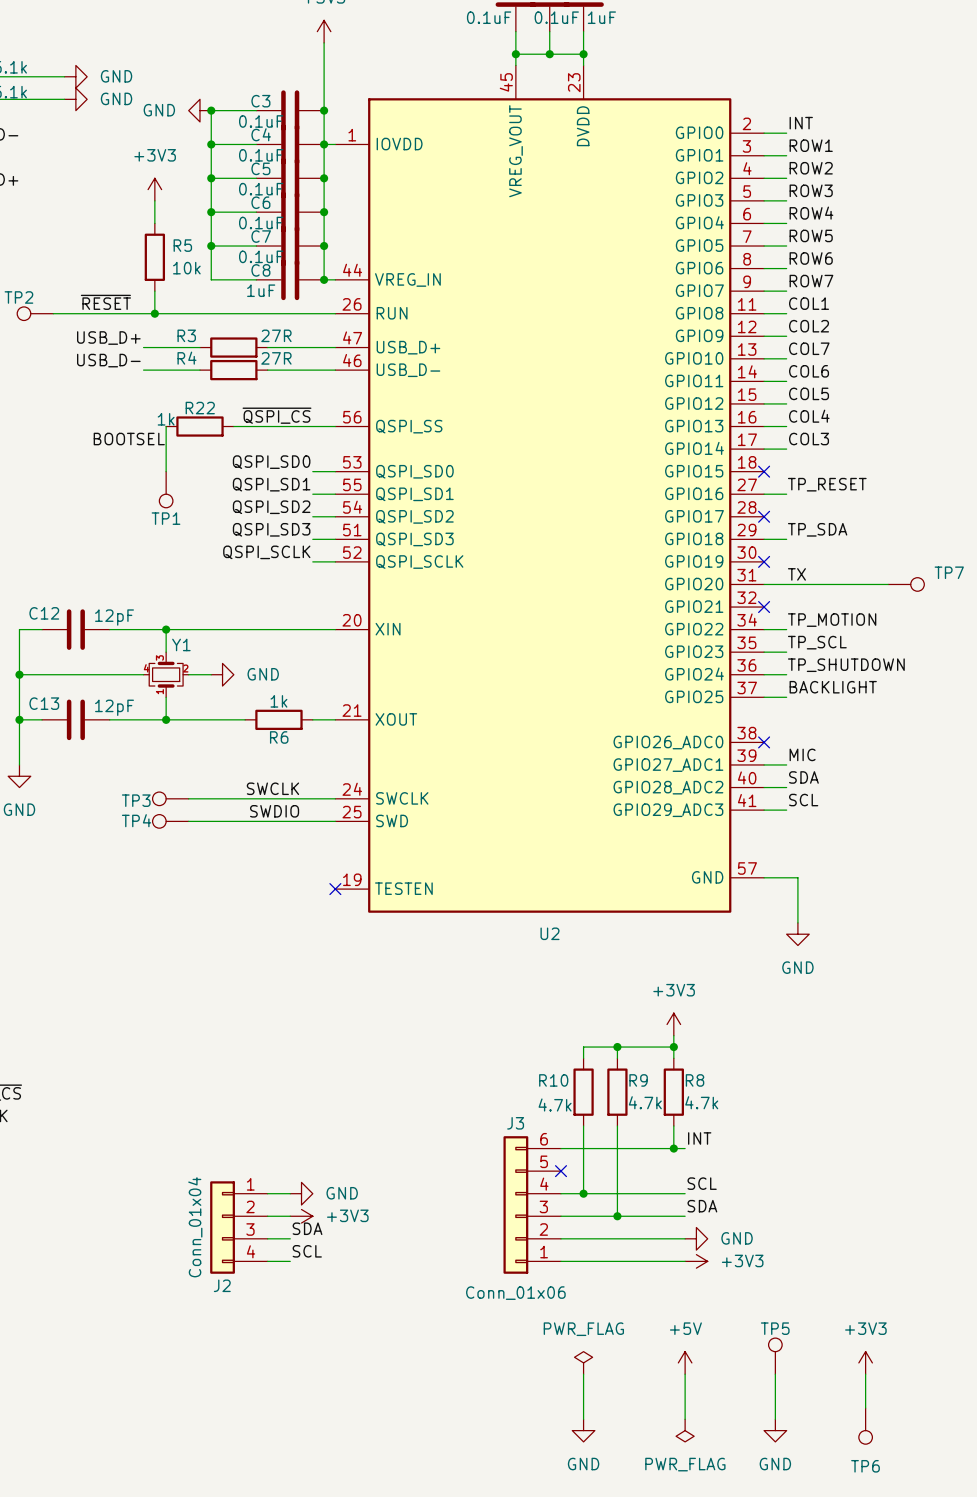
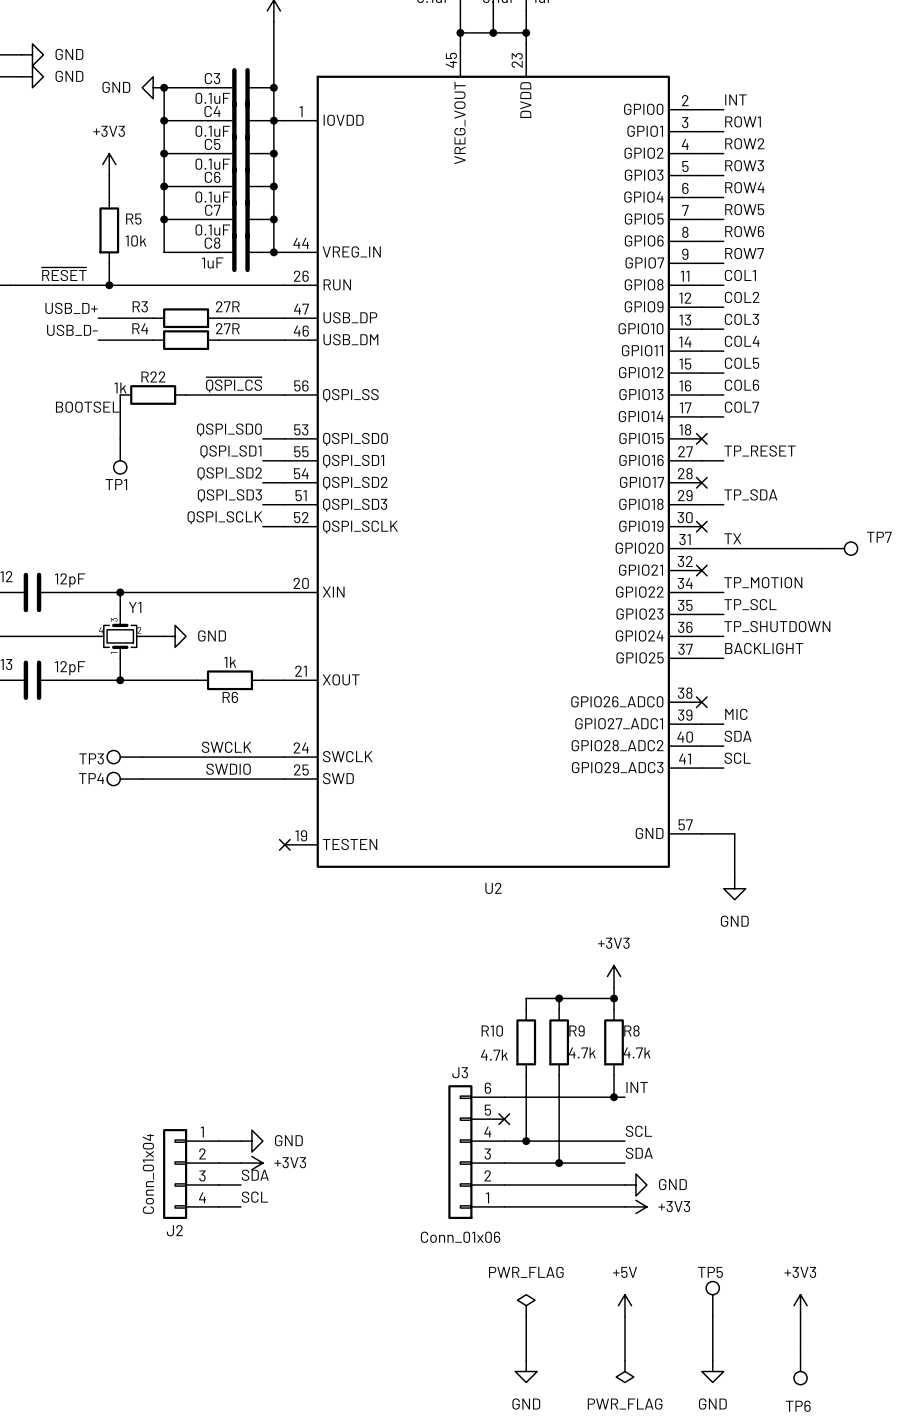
U2 pin name: USB_D+ (408, 347) -> USB_DP (350, 317)
label: COL7 (809, 348) -> COL3 (741, 319)
U2 pin name: USB_D- (408, 370) -> USB_DM (350, 339)
label: COL6 (809, 371) -> COL4 (742, 341)
label: COL4 (809, 416) -> COL6 (742, 385)
label: COL3 (809, 439) -> COL7 (741, 407)

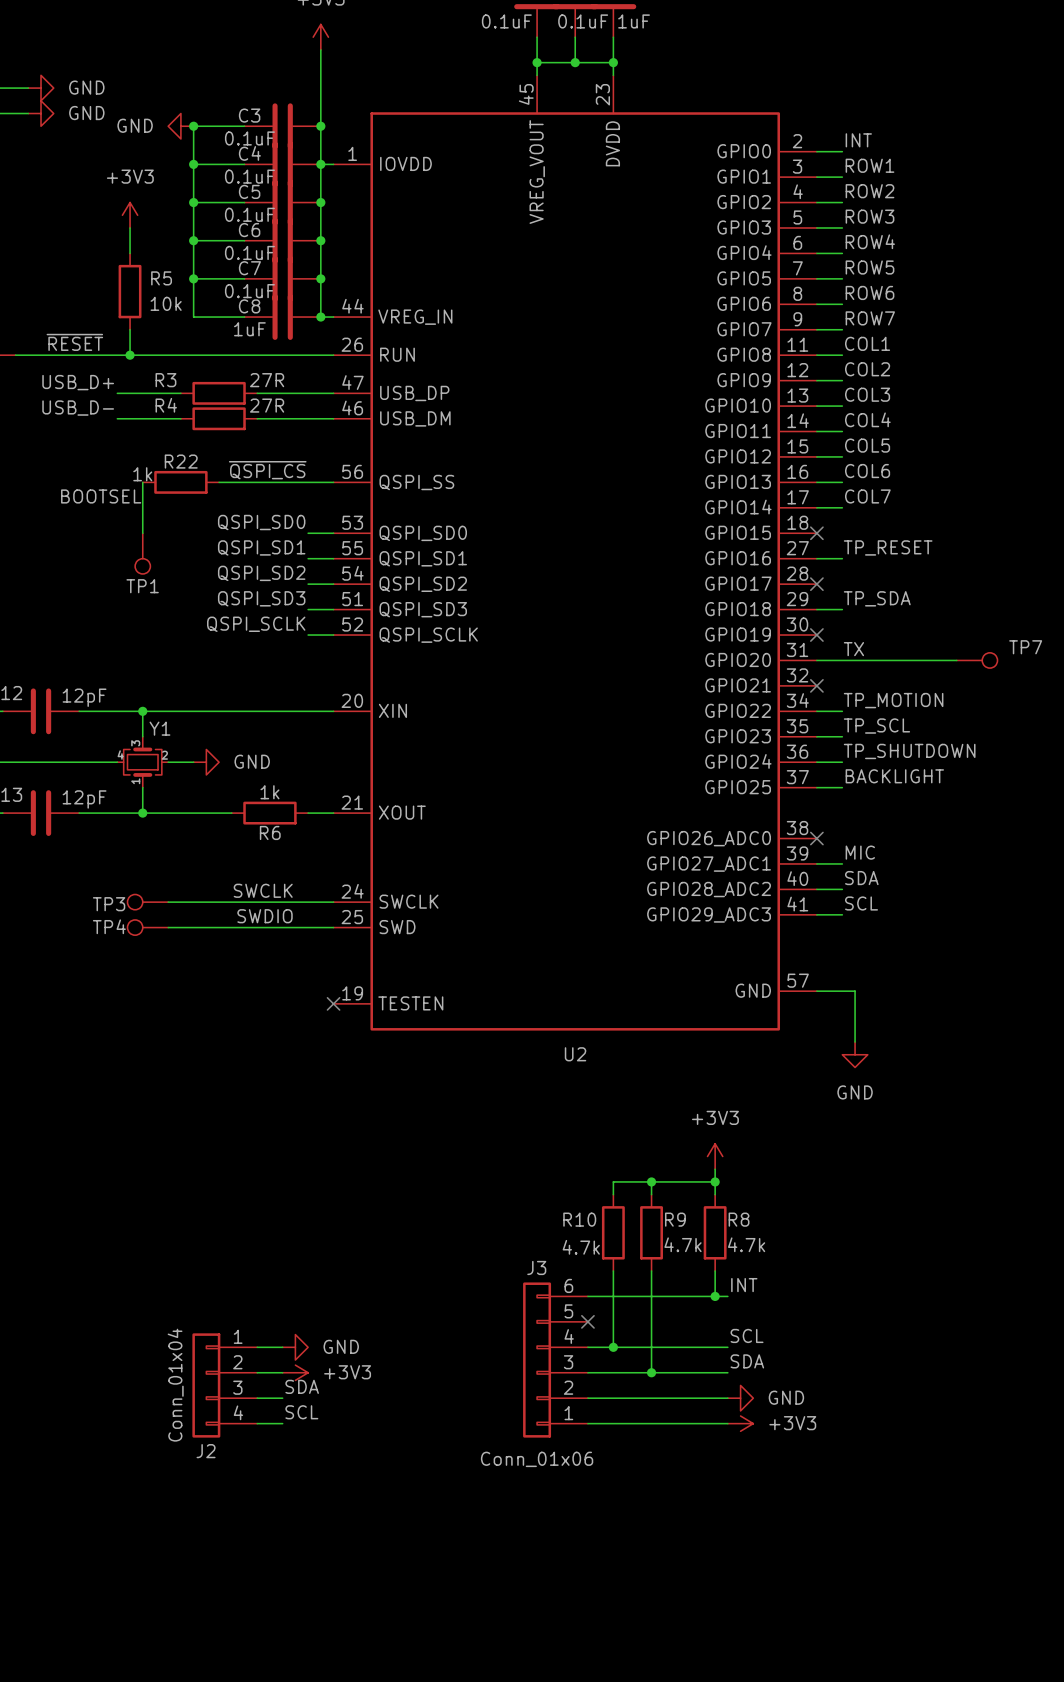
TP5: (712, 1299) -> none
power symbol: PWR_FLAG (526, 1305) -> none
power symbol: +5V (624, 1305) -> none
power symbol: +3V3 (800, 1305) -> none
wire: (526, 1316) (526, 1360) -> none
wire: (624, 1316) (624, 1360) -> none
wire: (712, 1316) (712, 1360) -> none
wire: (800, 1316) (800, 1349) -> none
TP6: (800, 1367) -> none
power symbol: GND (526, 1371) -> none
power symbol: PWR_FLAG (624, 1371) -> none
power symbol: GND (712, 1371) -> none

